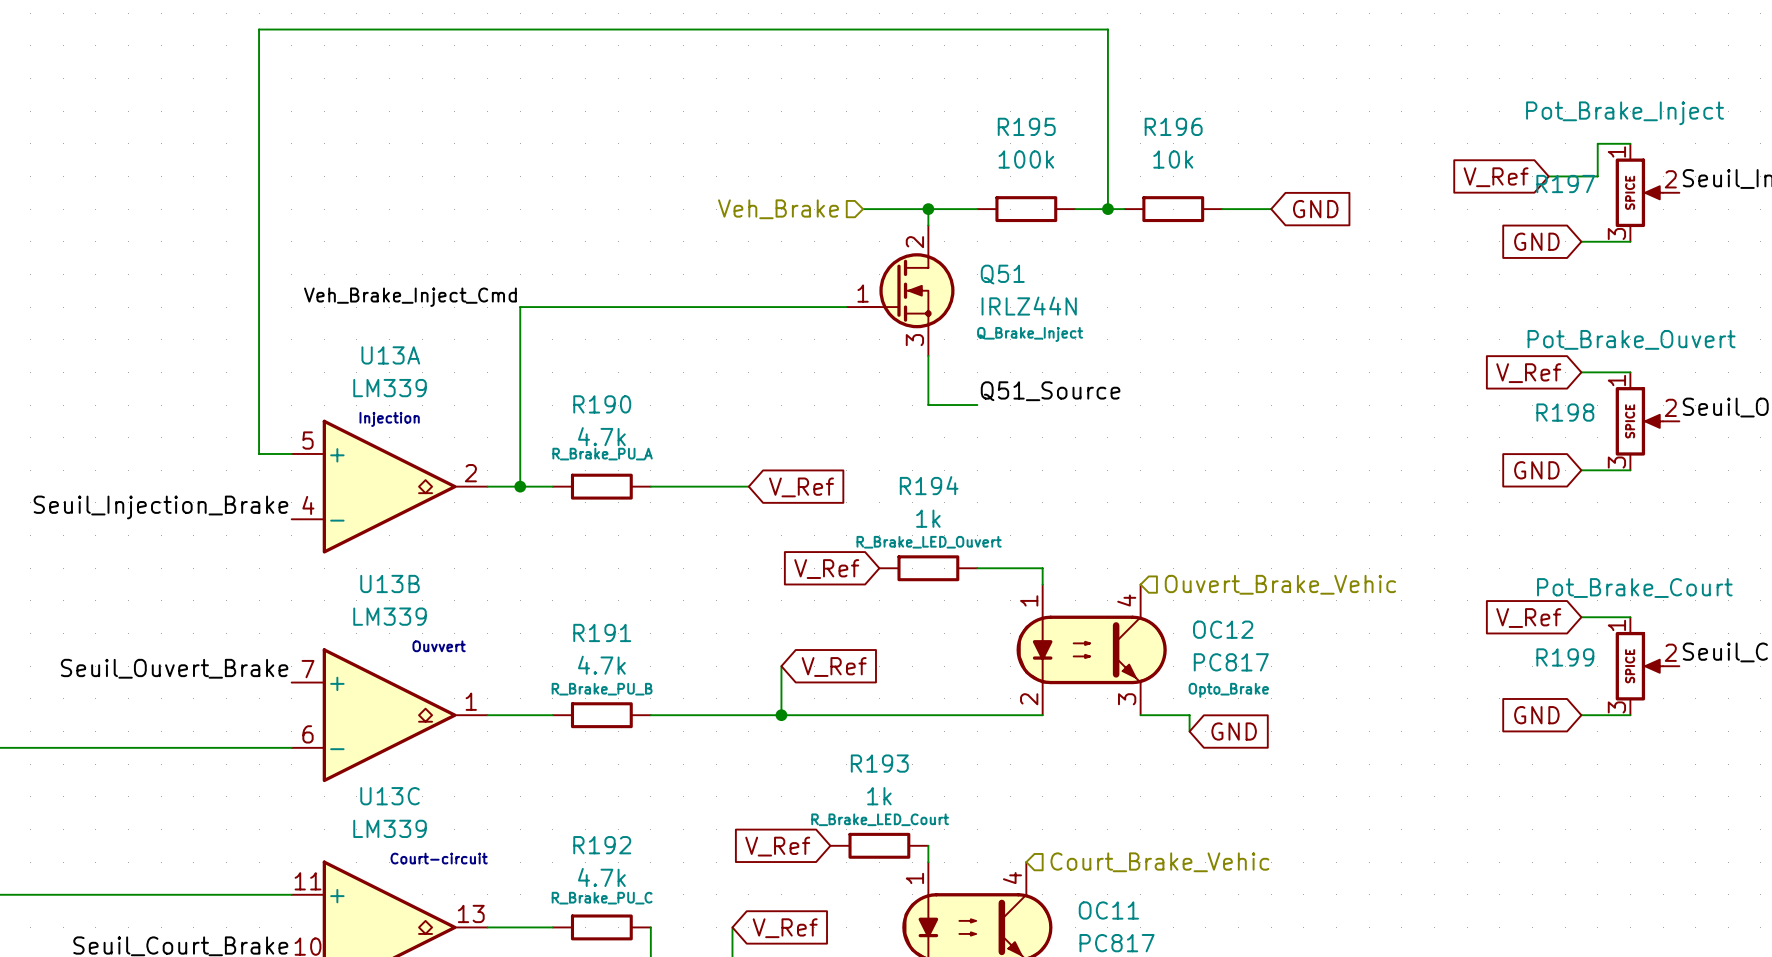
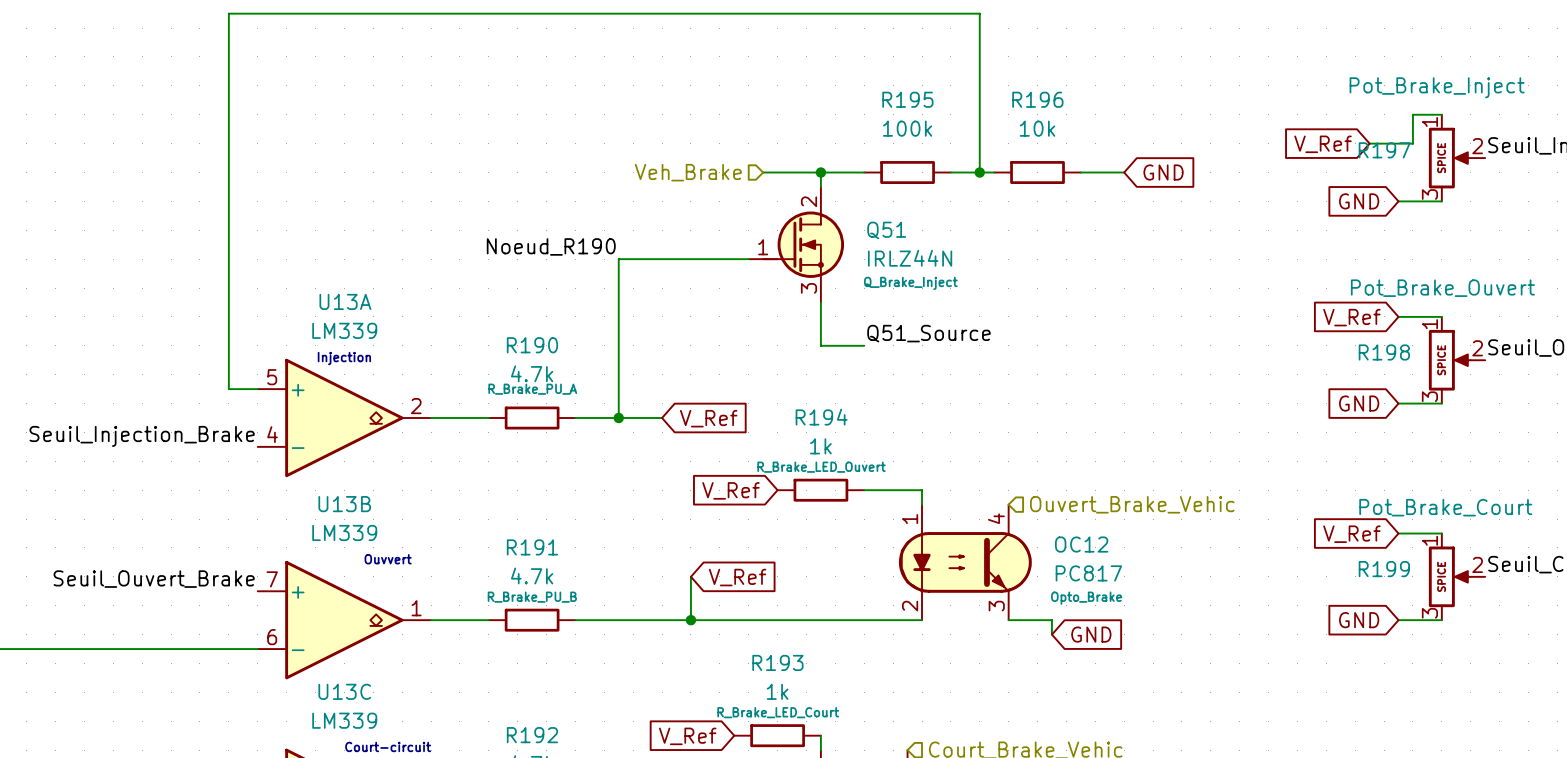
label: none -> Noeud_R190 (551, 246)
label: Veh_Brake_Inject_Cmd (410, 297) -> none
wire: (699, 307) (520, 307) (520, 486) -> (618, 259) (618, 418)
junction: (520, 486) -> none
junction: none -> (618, 418)

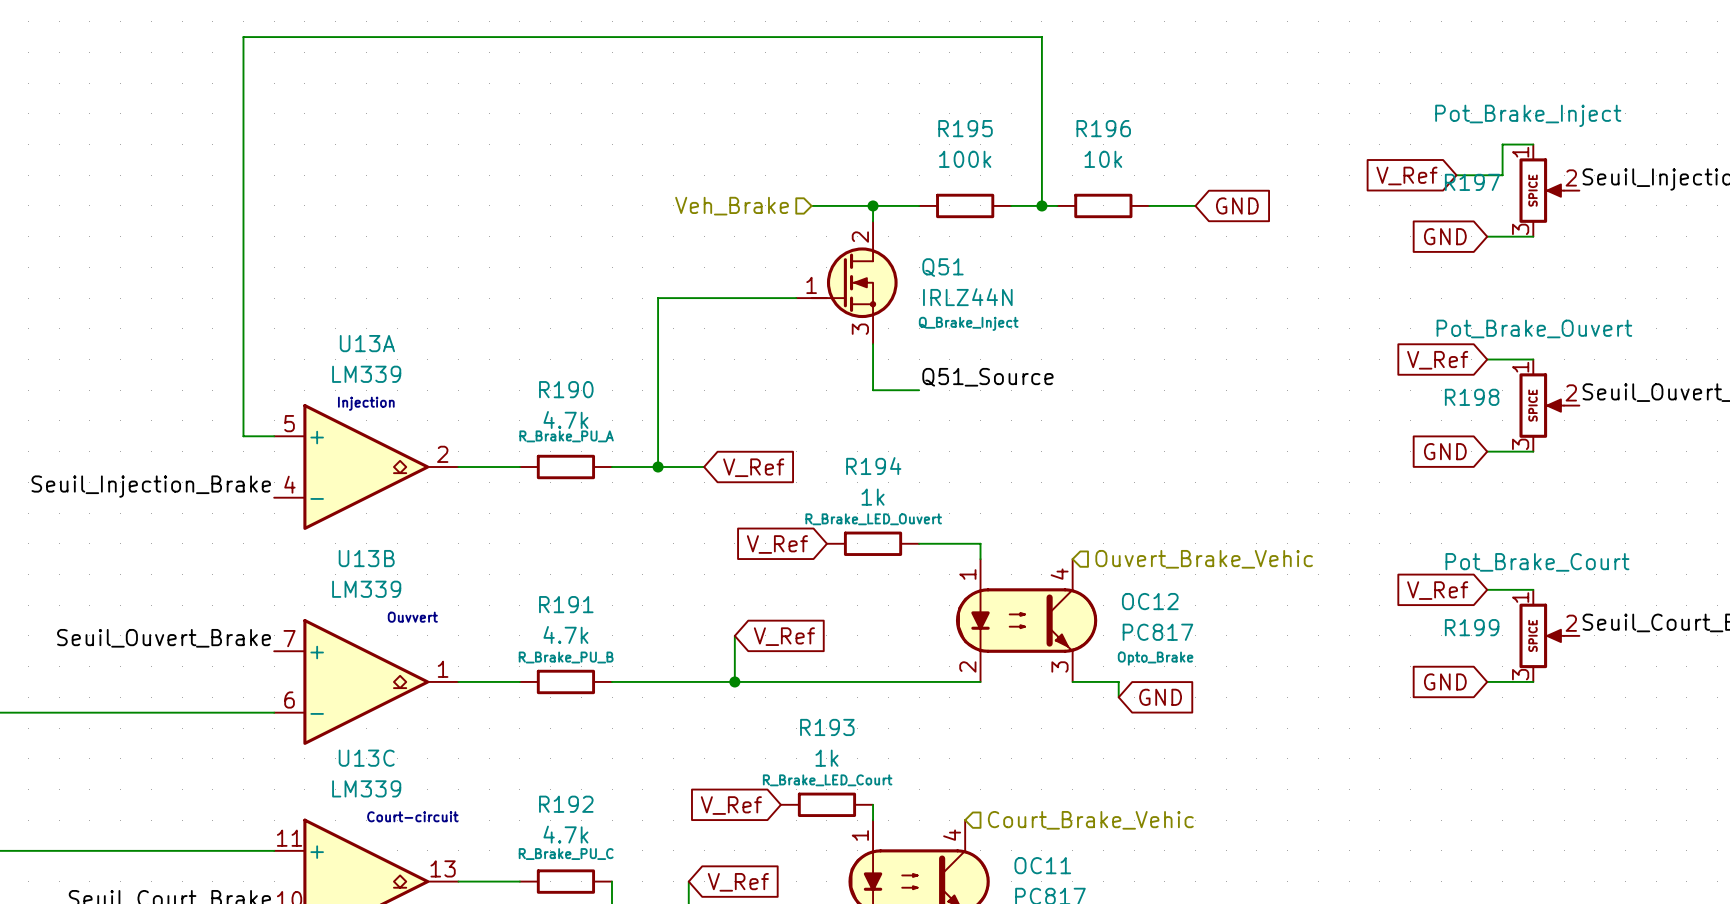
label: Noeud_R190 (551, 246) -> none

